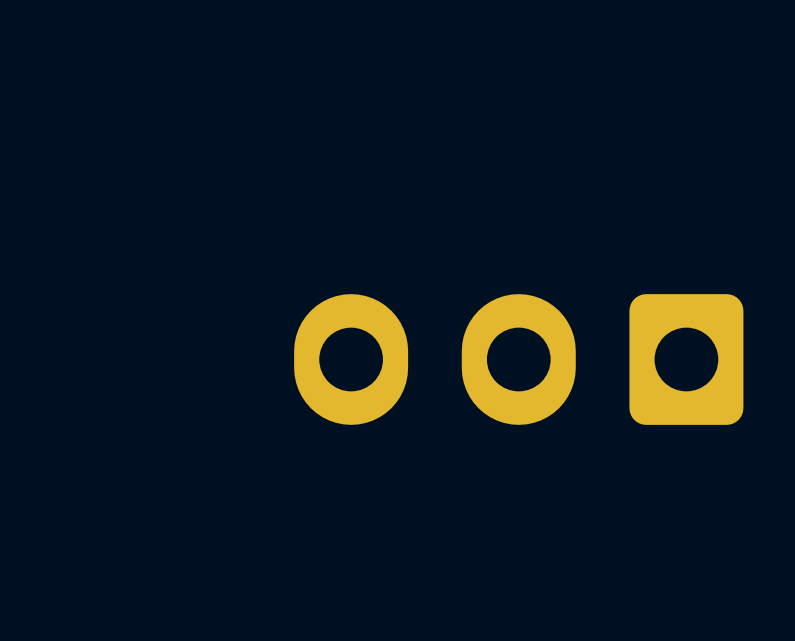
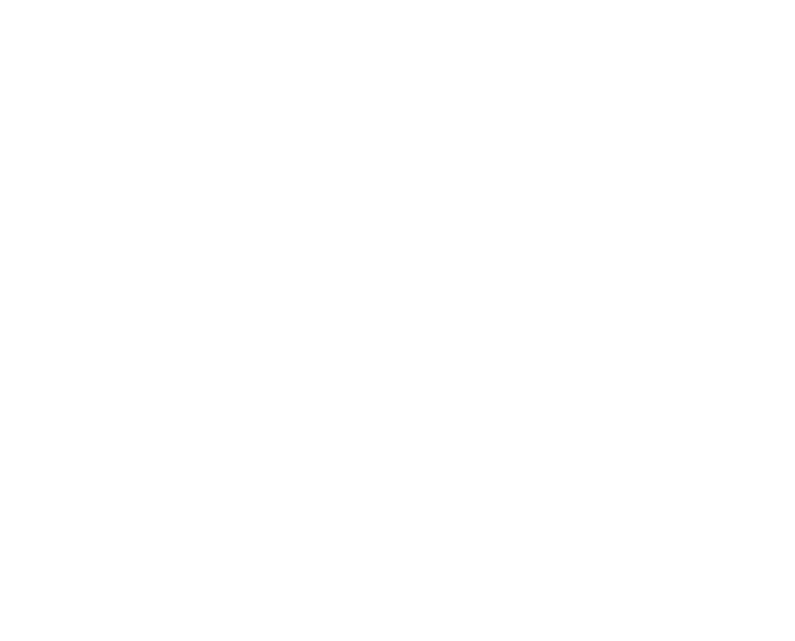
part: (518, 359) -> none

